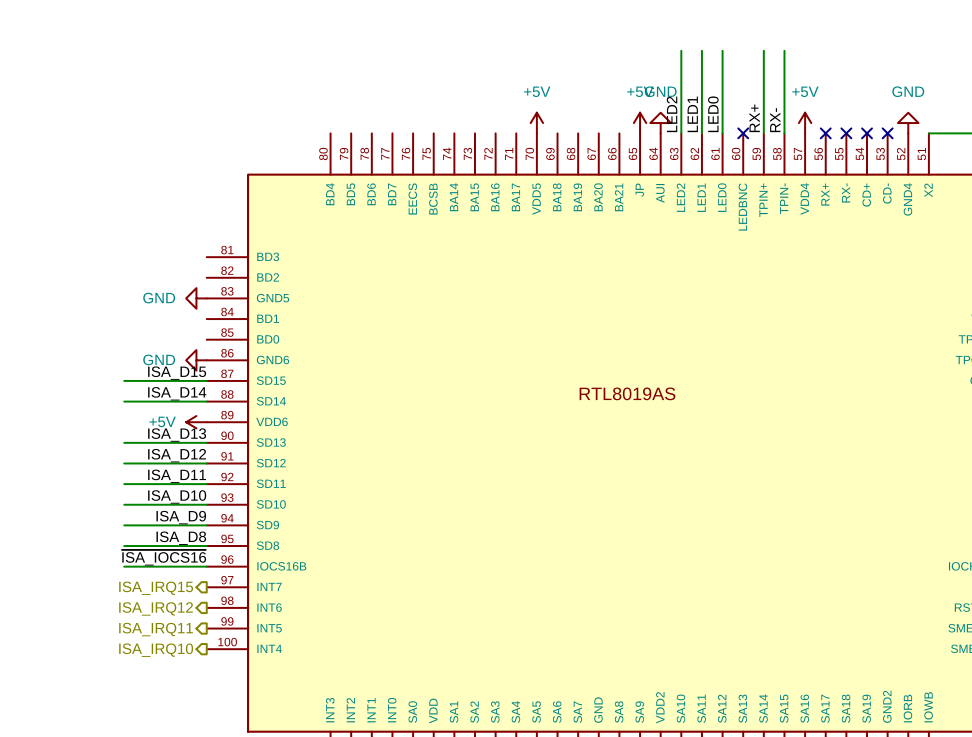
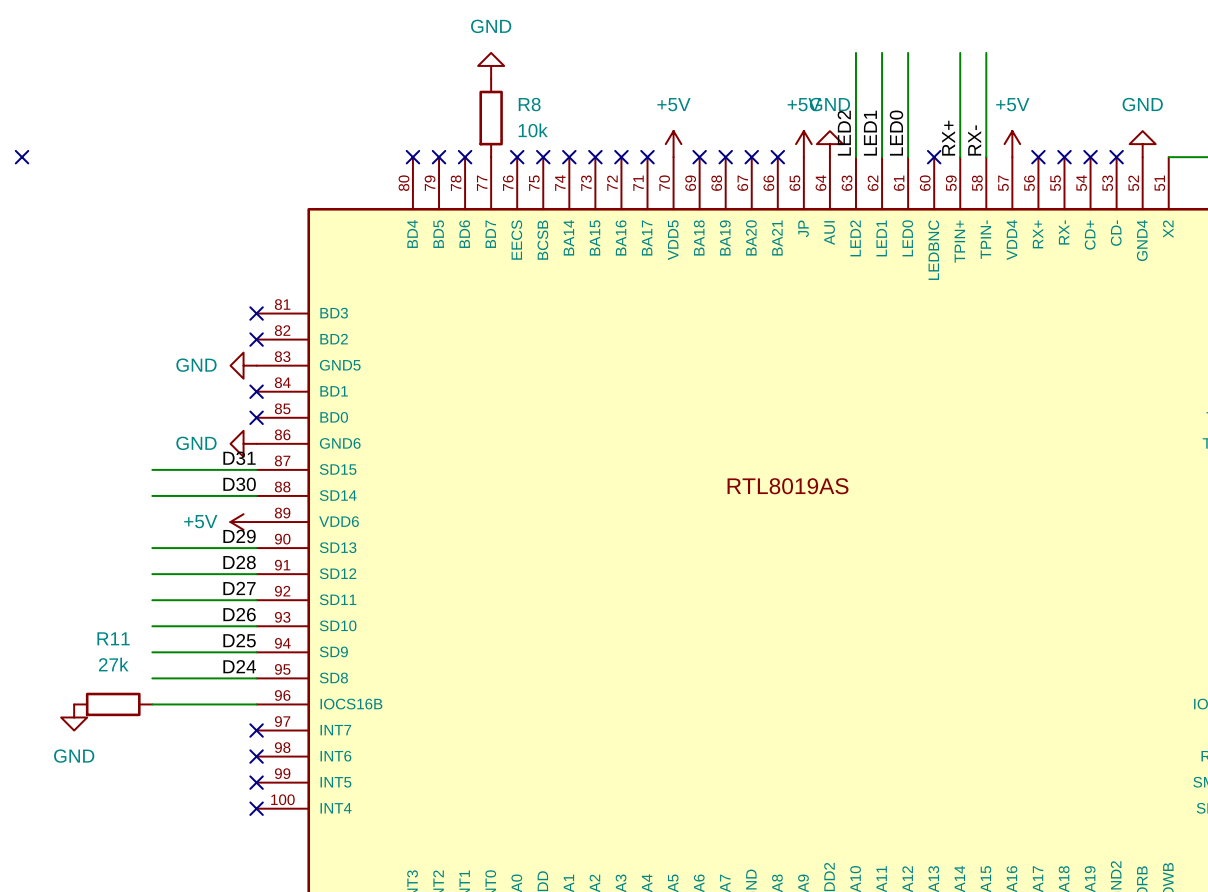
power symbol: none -> GND (491, 65)
R8: none -> 10k (491, 118)
no-connect mark: none -> (22, 157)
no-connect mark: none -> (412, 157)
no-connect mark: none -> (439, 157)
no-connect mark: none -> (465, 157)
no-connect mark: none -> (517, 157)
no-connect mark: none -> (543, 157)
no-connect mark: none -> (569, 157)
no-connect mark: none -> (595, 157)
no-connect mark: none -> (621, 157)
no-connect mark: none -> (647, 157)
no-connect mark: none -> (699, 157)
no-connect mark: none -> (725, 157)
no-connect mark: none -> (751, 157)
no-connect mark: none -> (777, 157)
no-connect mark: none -> (256, 313)
no-connect mark: none -> (256, 339)
no-connect mark: none -> (256, 391)
no-connect mark: none -> (256, 417)
label: ISA_D15 (177, 373) -> D31 (239, 458)
label: ISA_D14 (177, 393) -> D30 (239, 484)
label: ISA_D13 (177, 435) -> D29 (239, 536)
label: ISA_D12 (177, 455) -> D28 (239, 562)
label: ISA_D11 (177, 476) -> D27 (239, 588)
label: ISA_D10 (177, 496) -> D26 (239, 614)
label: ISA_D9 (181, 517) -> D25 (239, 640)
label: ISA_D8 (181, 538) -> D24 (239, 666)
label: ~{ISA_IOCS16} (164, 557) -> none
R11: none -> 27k (113, 704)
power symbol: none -> GND (74, 717)
no-connect mark: none -> (256, 730)
hierarchical label: ISA_IRQ15 (156, 588) -> none
no-connect mark: none -> (256, 756)
hierarchical label: ISA_IRQ12 (156, 608) -> none
no-connect mark: none -> (256, 782)
hierarchical label: ISA_IRQ11 (156, 629) -> none
no-connect mark: none -> (256, 808)
hierarchical label: ISA_IRQ10 (156, 650) -> none

